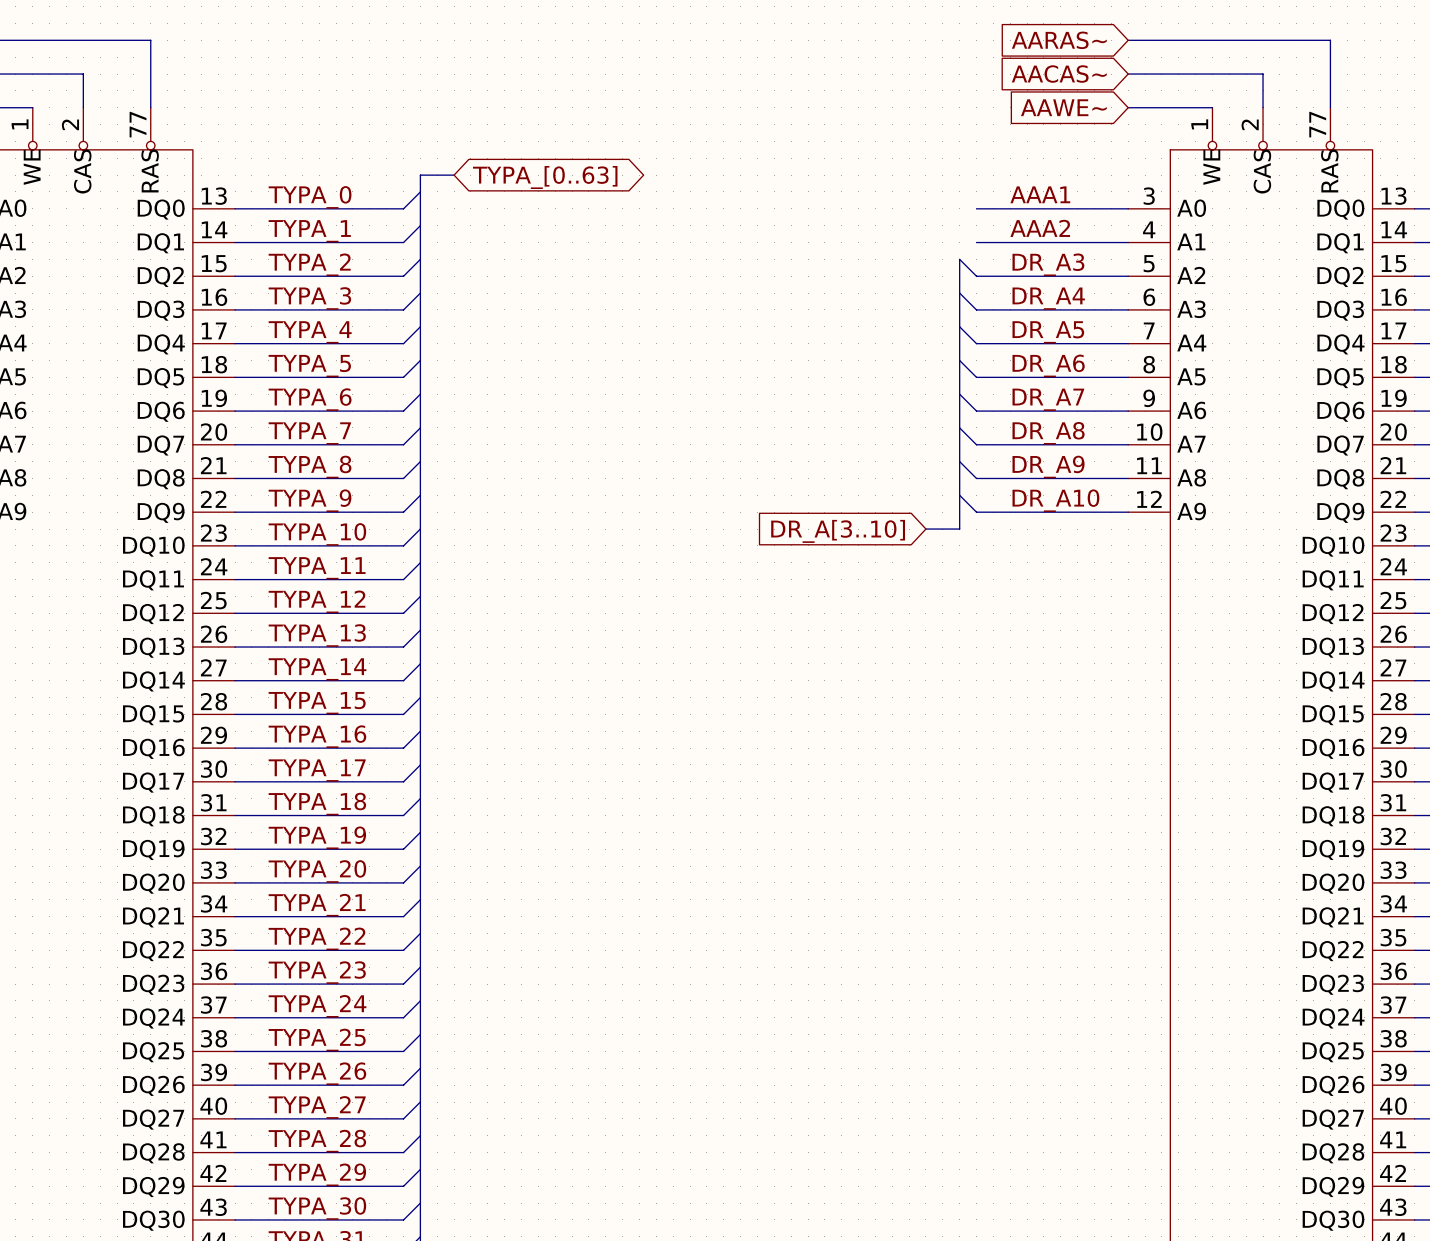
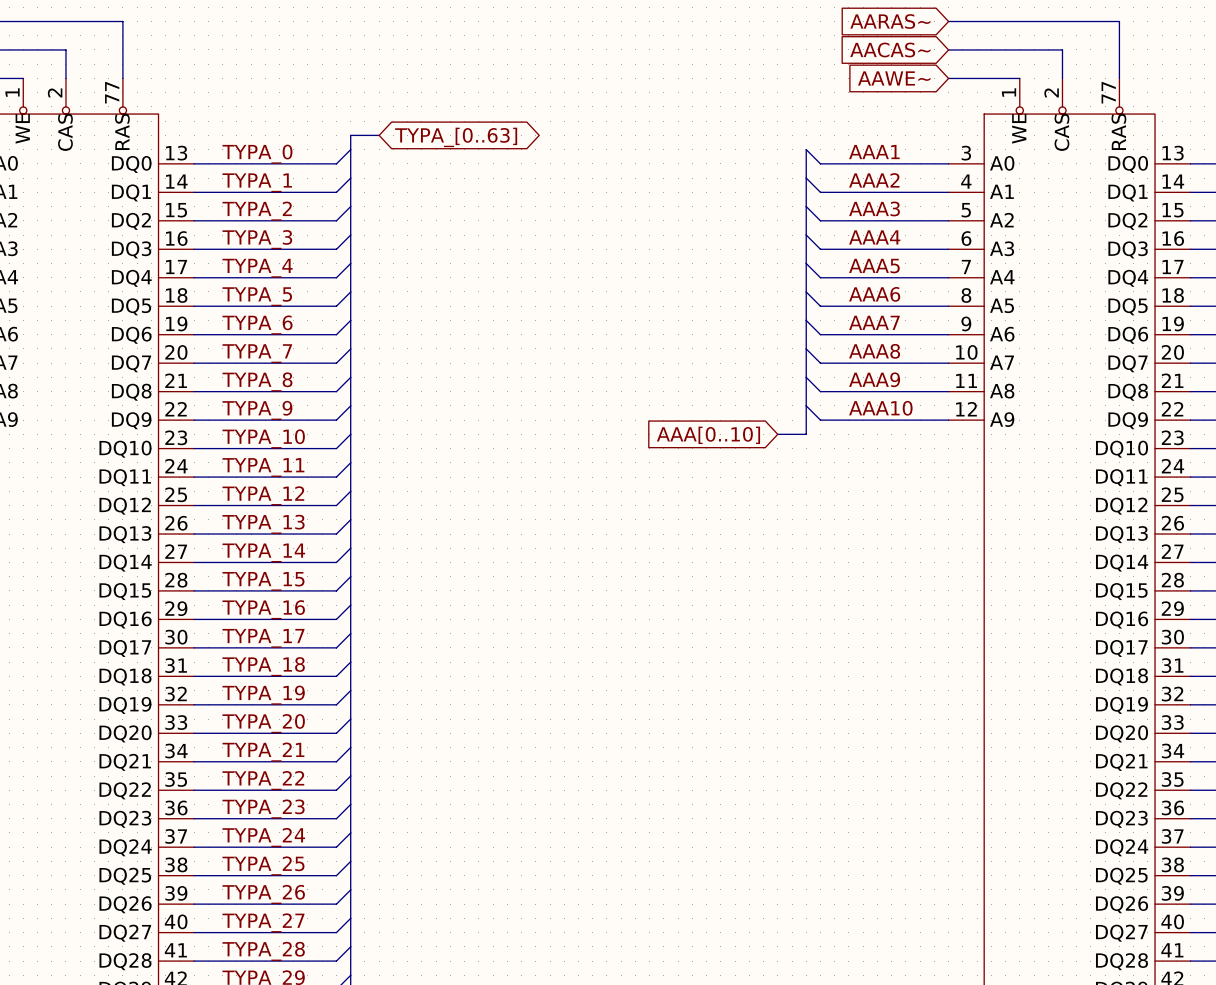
wire: none -> (806, 149) (820, 163)
bus: none -> (806, 149) (806, 206)
wire: none -> (806, 178) (820, 192)
label: DR_A3 (1048, 264) -> AAA3 (874, 208)
label: DR_A4 (1048, 298) -> AAA4 (874, 237)
label: DR_A5 (1048, 332) -> AAA5 (874, 266)
label: DR_A6 (1048, 365) -> AAA6 (874, 294)
label: DR_A7 (1048, 399) -> AAA7 (874, 322)
label: DR_A8 (1048, 433) -> AAA8 (874, 351)
label: DR_A9 (1048, 467) -> AAA9 (874, 379)
label: DR_A10 (1055, 500) -> AAA10 (880, 408)
global label: DR_A[3..10] (838, 531) -> AAA[0..10] (708, 435)

